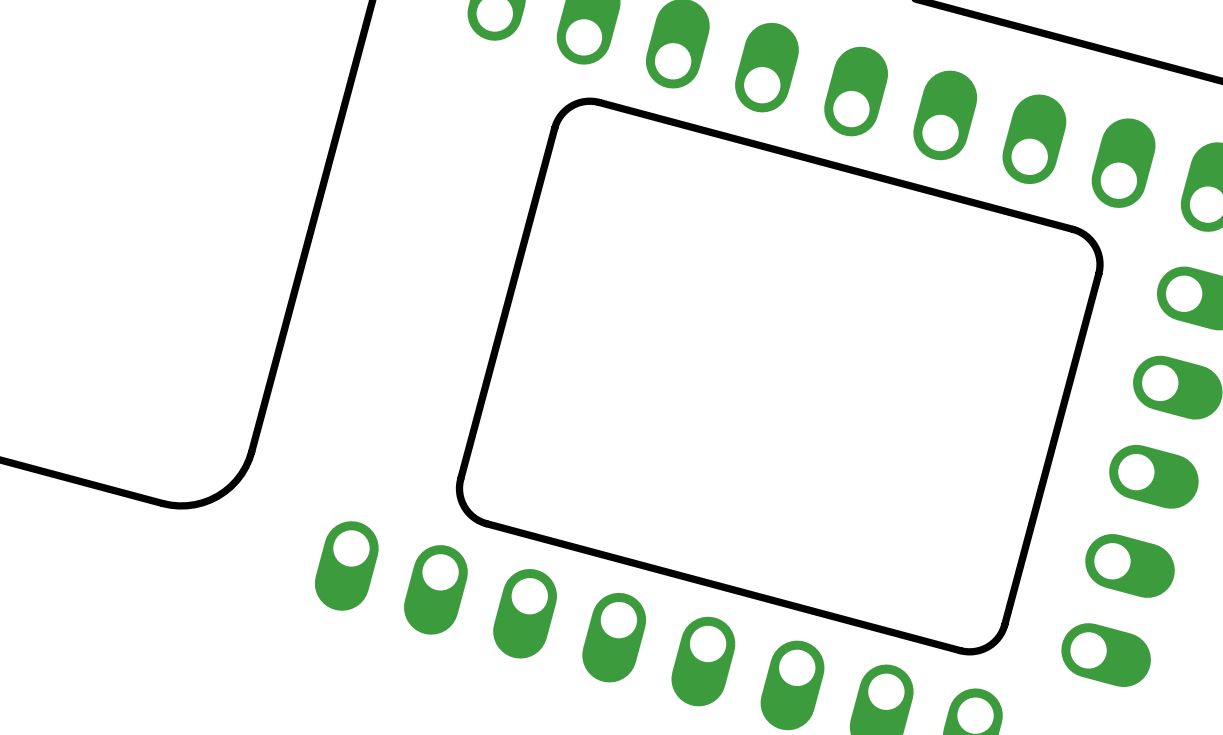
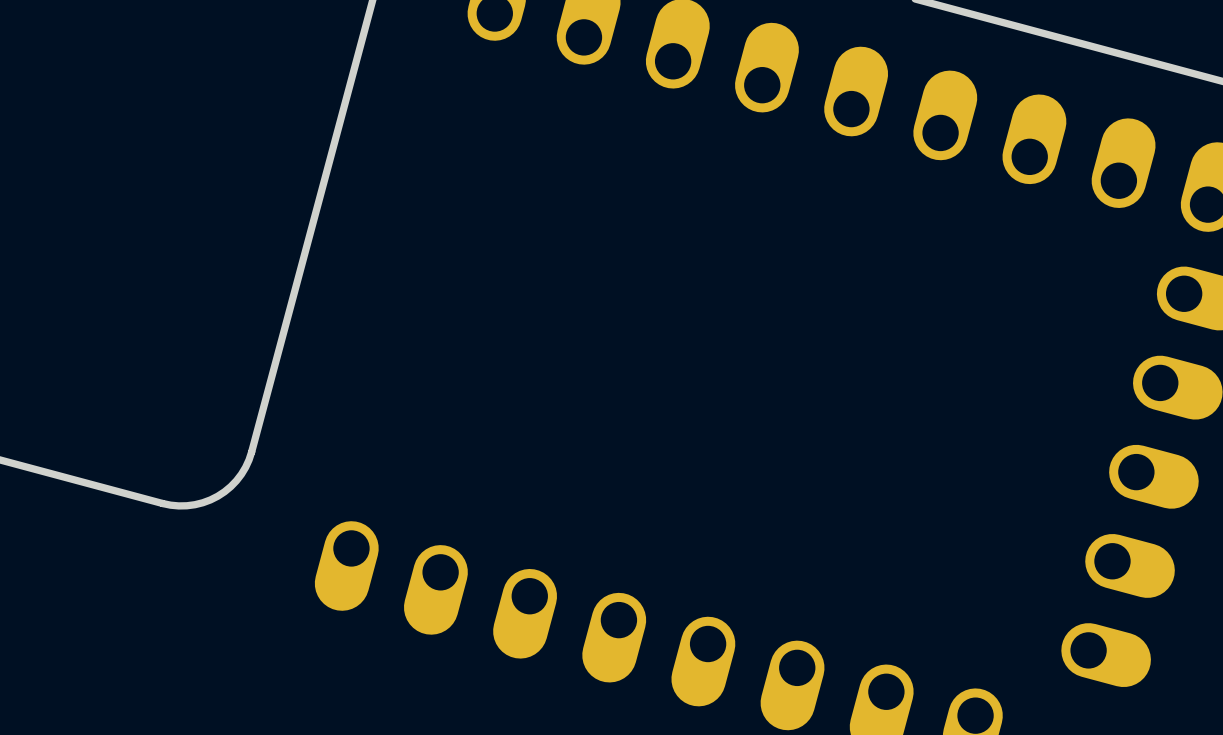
board edge: (599, 102) (1073, 229) (1084, 234) (1092, 242) (1099, 257) (1098, 273) (1004, 624) (999, 635) (991, 644) (976, 651) (960, 650) (486, 523) (475, 518) (466, 510) (460, 495) (460, 479) (554, 128) (559, 117) (571, 106) (587, 101) (599, 102) -> none

